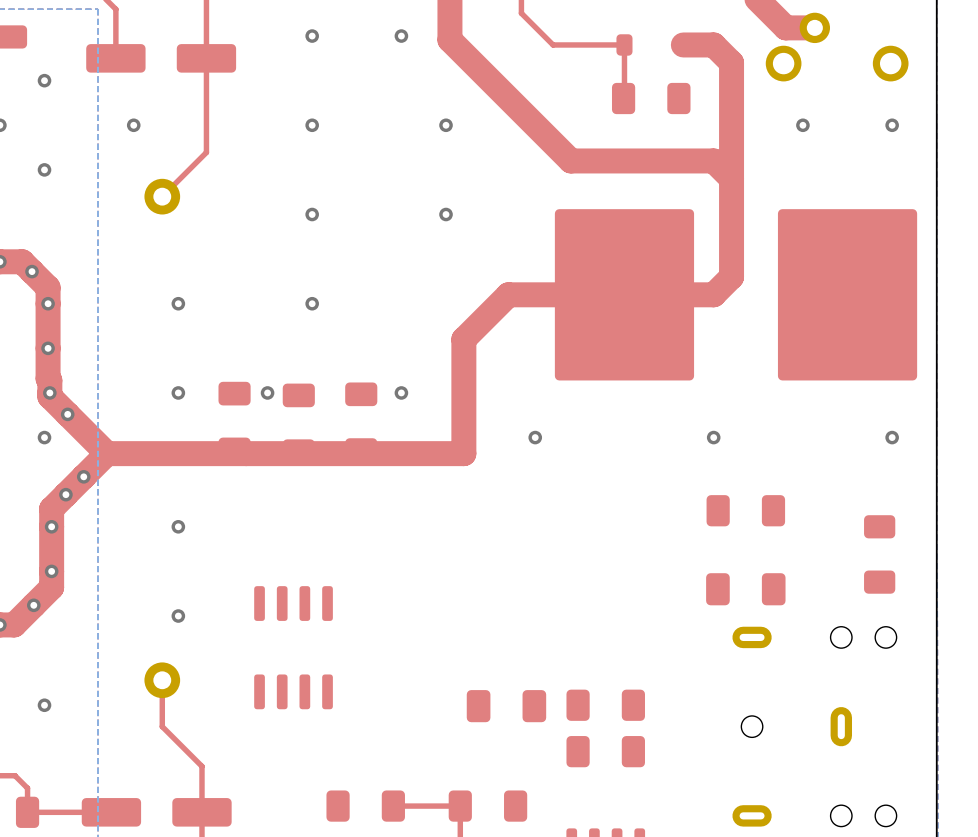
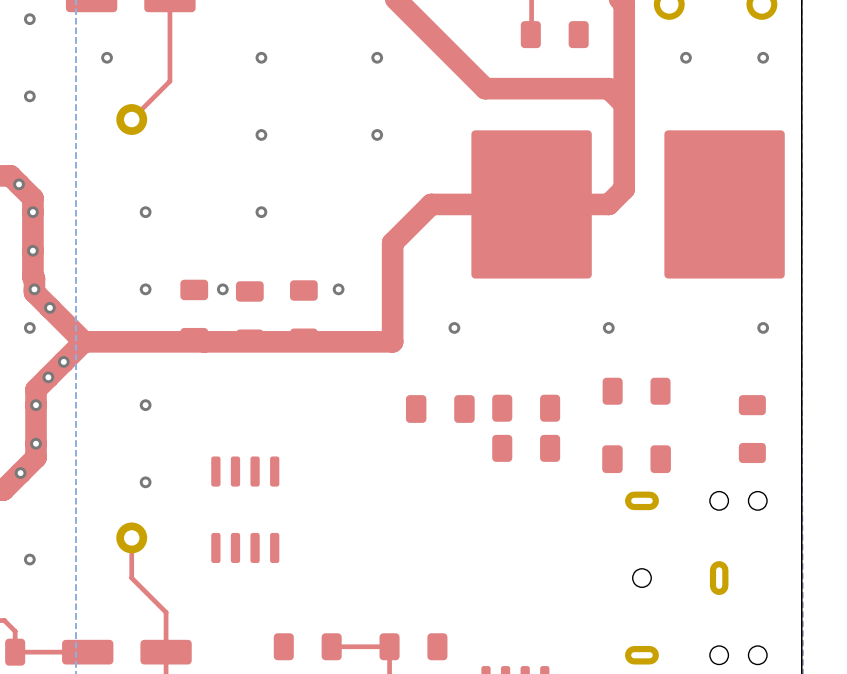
part: none -> (526, 408)
part: none -> (526, 448)
part: (605, 705) -> none
part position: (506, 706) -> (440, 409)
part: (605, 751) -> none

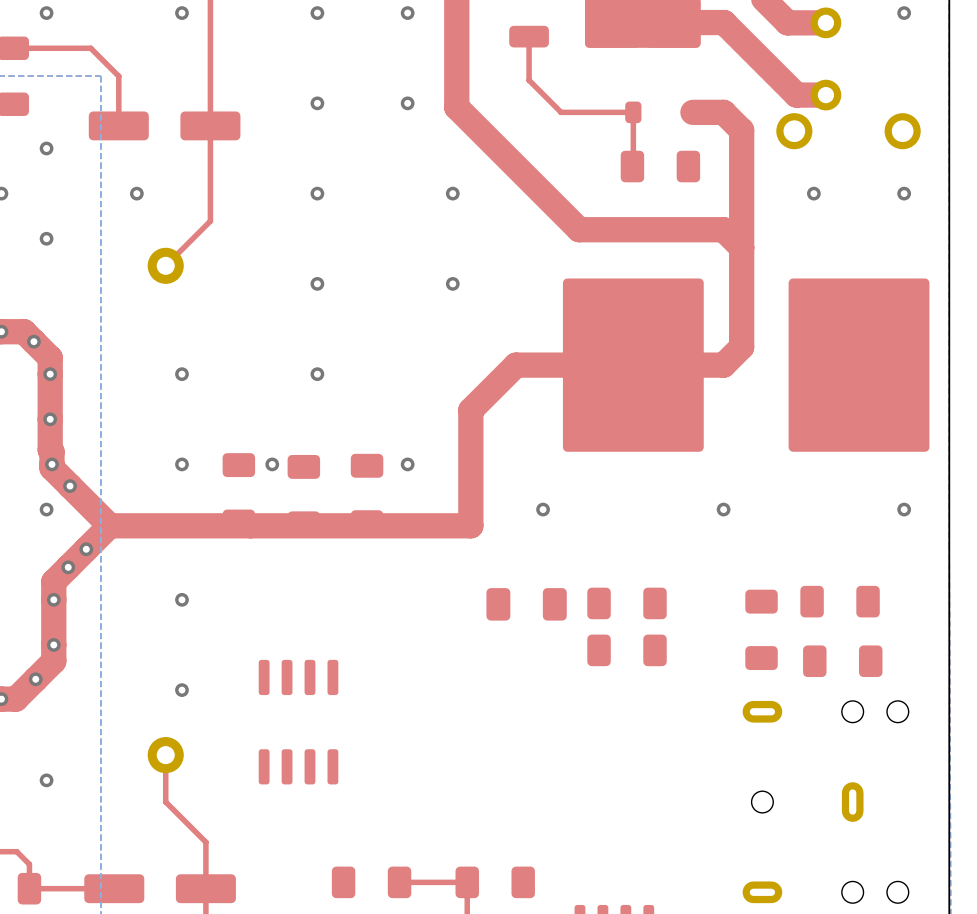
part: (636, 391) -> none
part: none -> (840, 601)
part: (752, 429) -> none
part: none -> (842, 661)
part rotation: 0° (636, 459) -> 90° clockwise (761, 629)

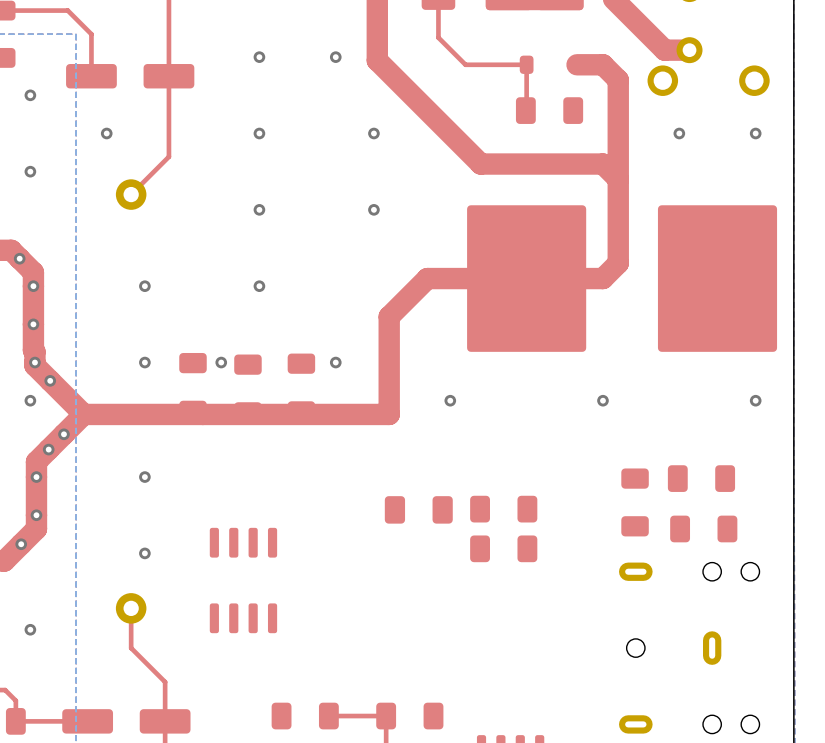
part: (627, 603) -> none
part position: (526, 604) -> (418, 509)
part: none -> (503, 509)
part: (627, 650) -> none
part: none -> (503, 548)

